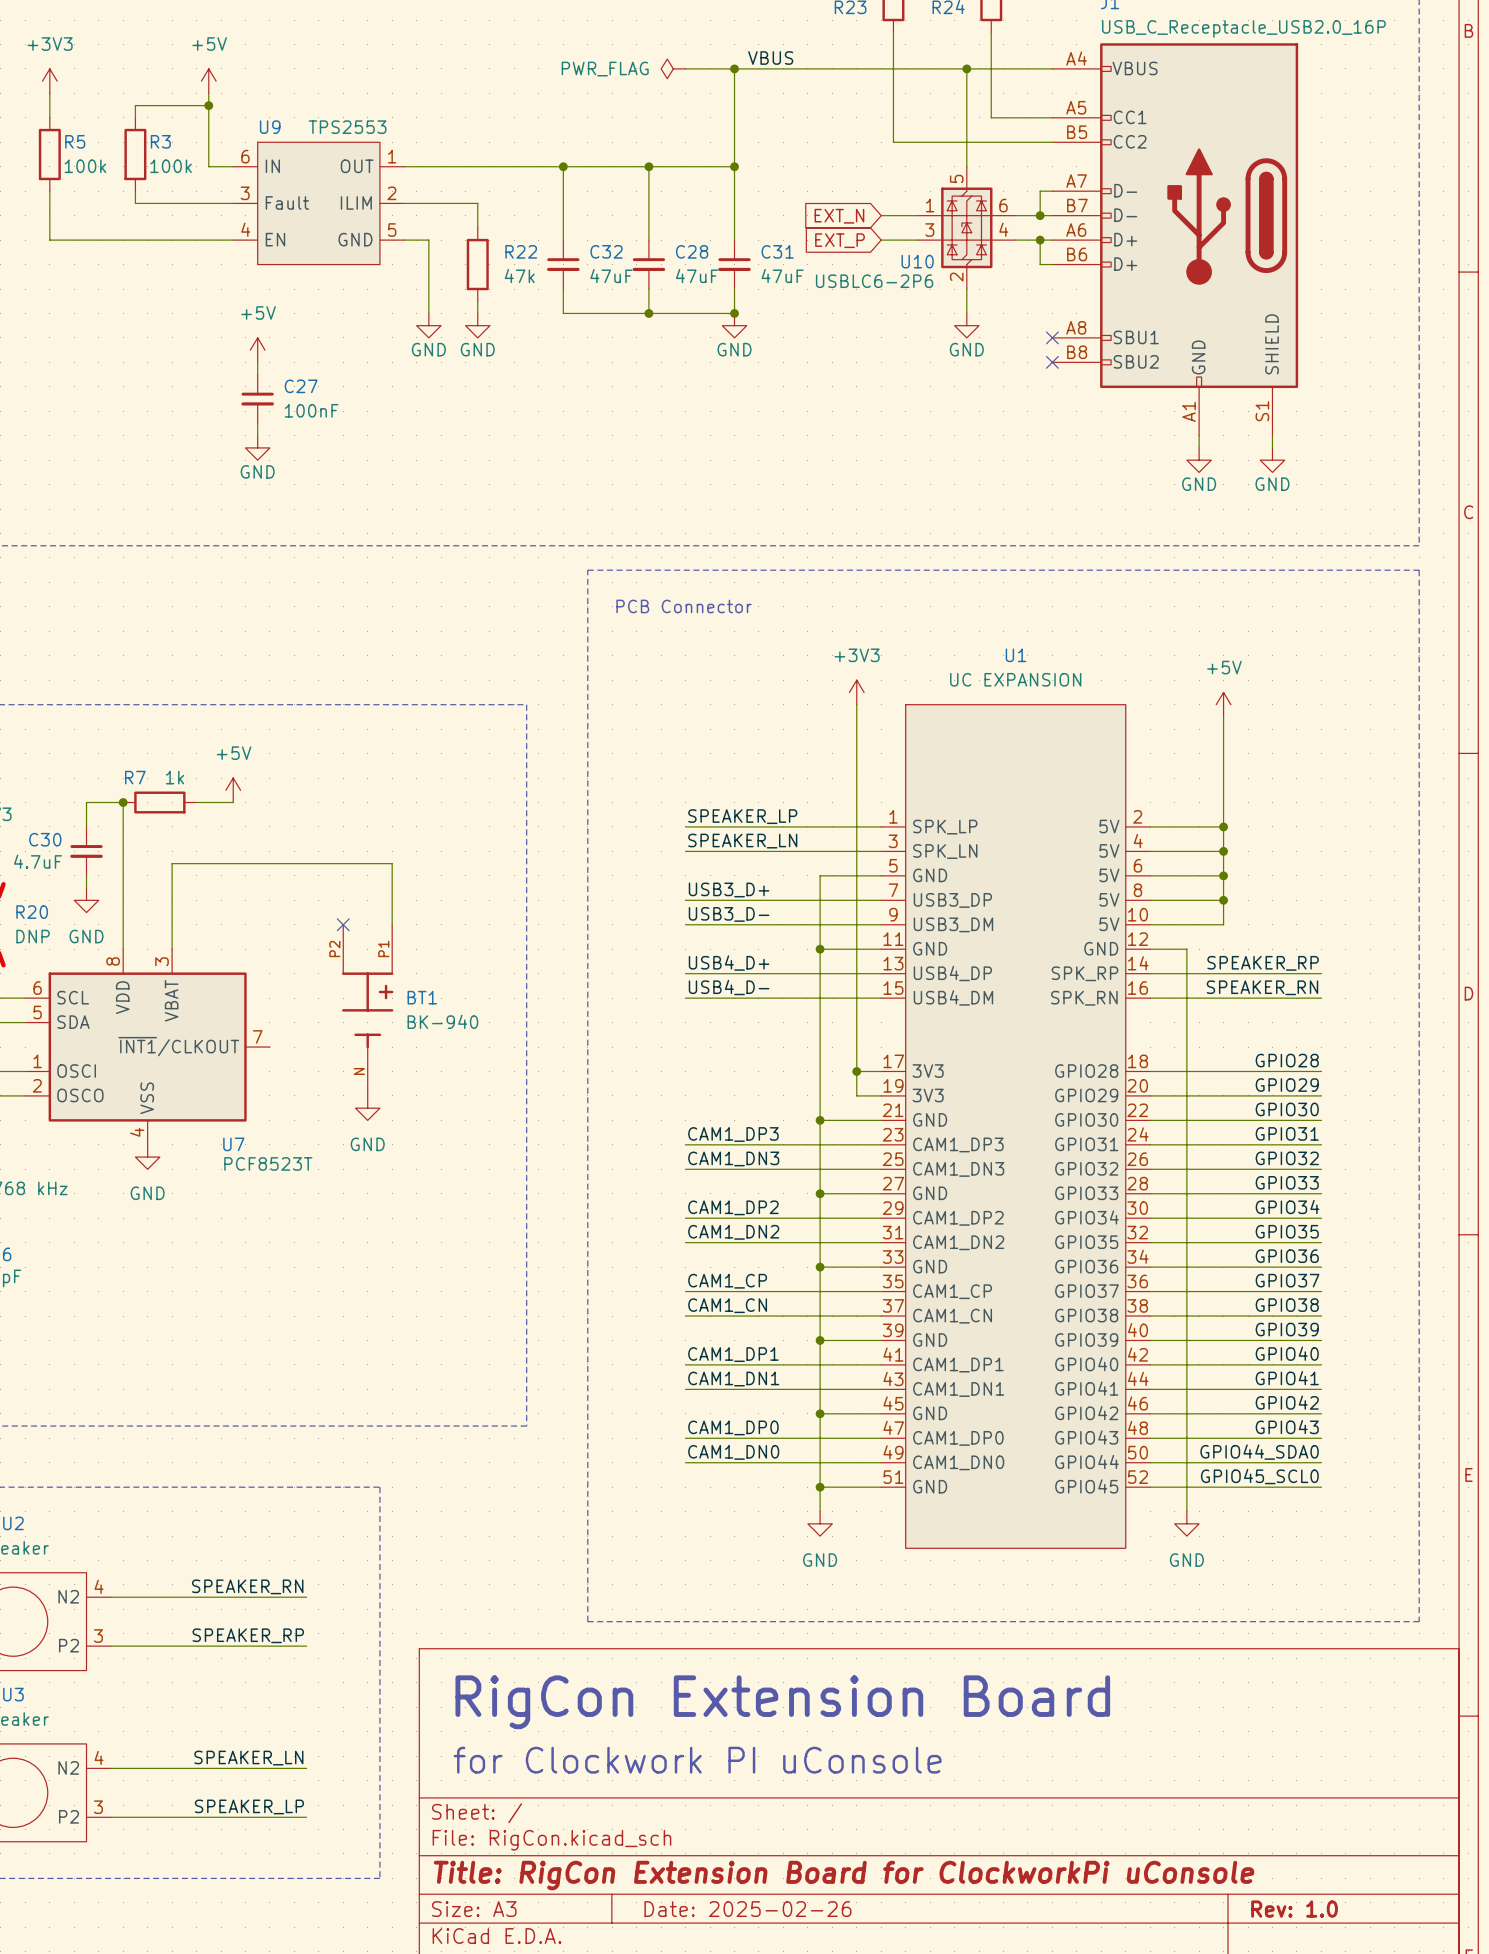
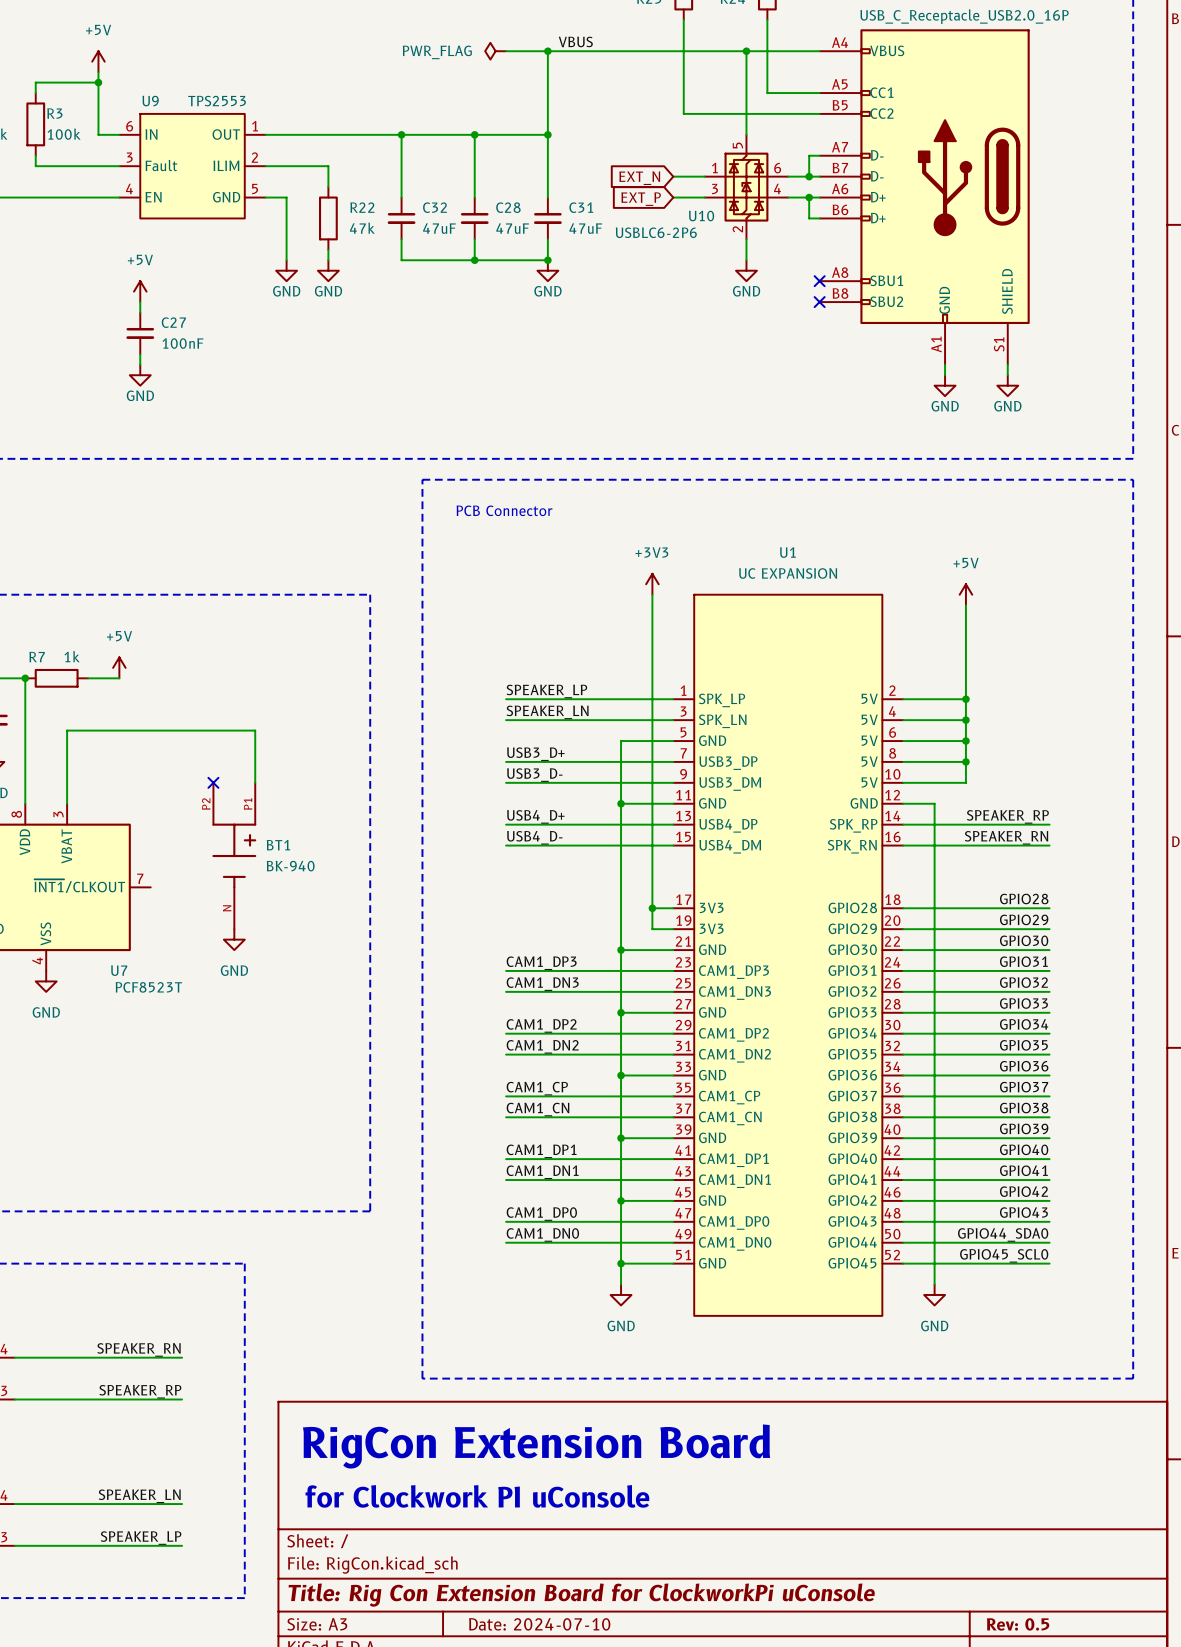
title block: Title: RigCon Extension Board for ClockworkPi uConsole (844, 1875) -> Title: Rig Con Extension Board for ClockworkPi uConsole (581, 1595)
title block: Date: 2025-02-26 (747, 1909) -> Date: 2024-07-10 (539, 1624)
title block: Rev: 1.0 (1294, 1909) -> Rev: 0.5 (1018, 1624)

